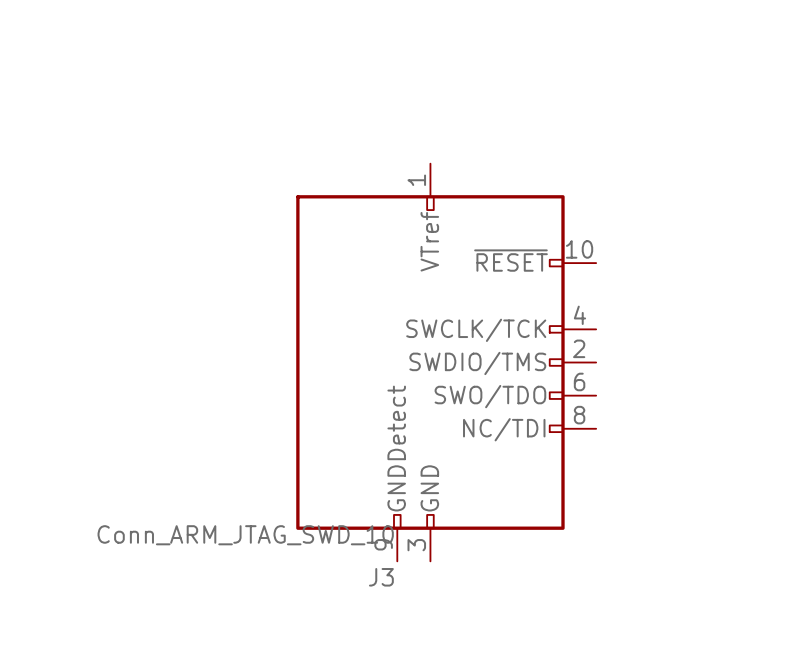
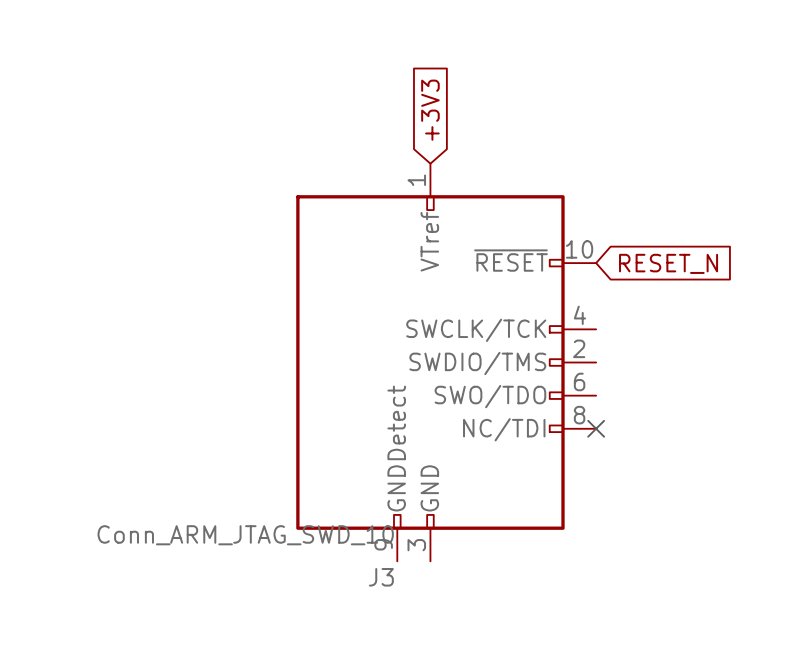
global label: none -> +3V3 (430, 110)
global label: none -> RESET_N (668, 263)
no-connect mark: none -> (596, 428)

